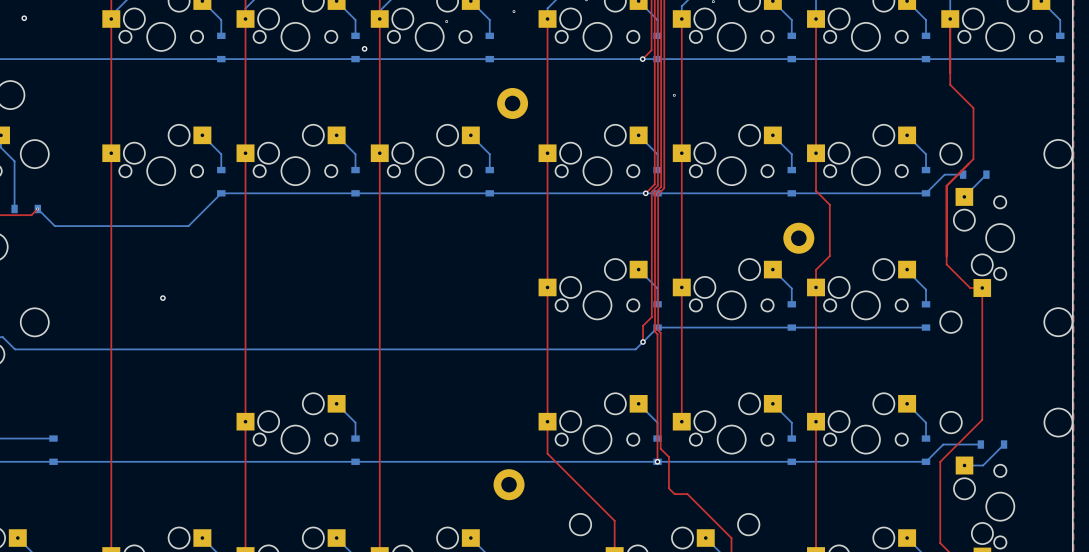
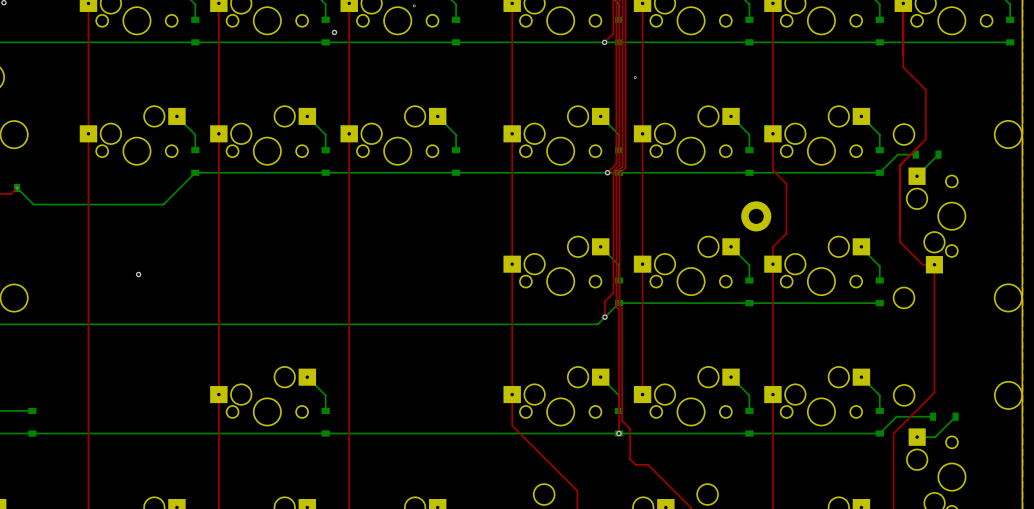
part: (512, 103) -> none
part: (509, 484) -> none

